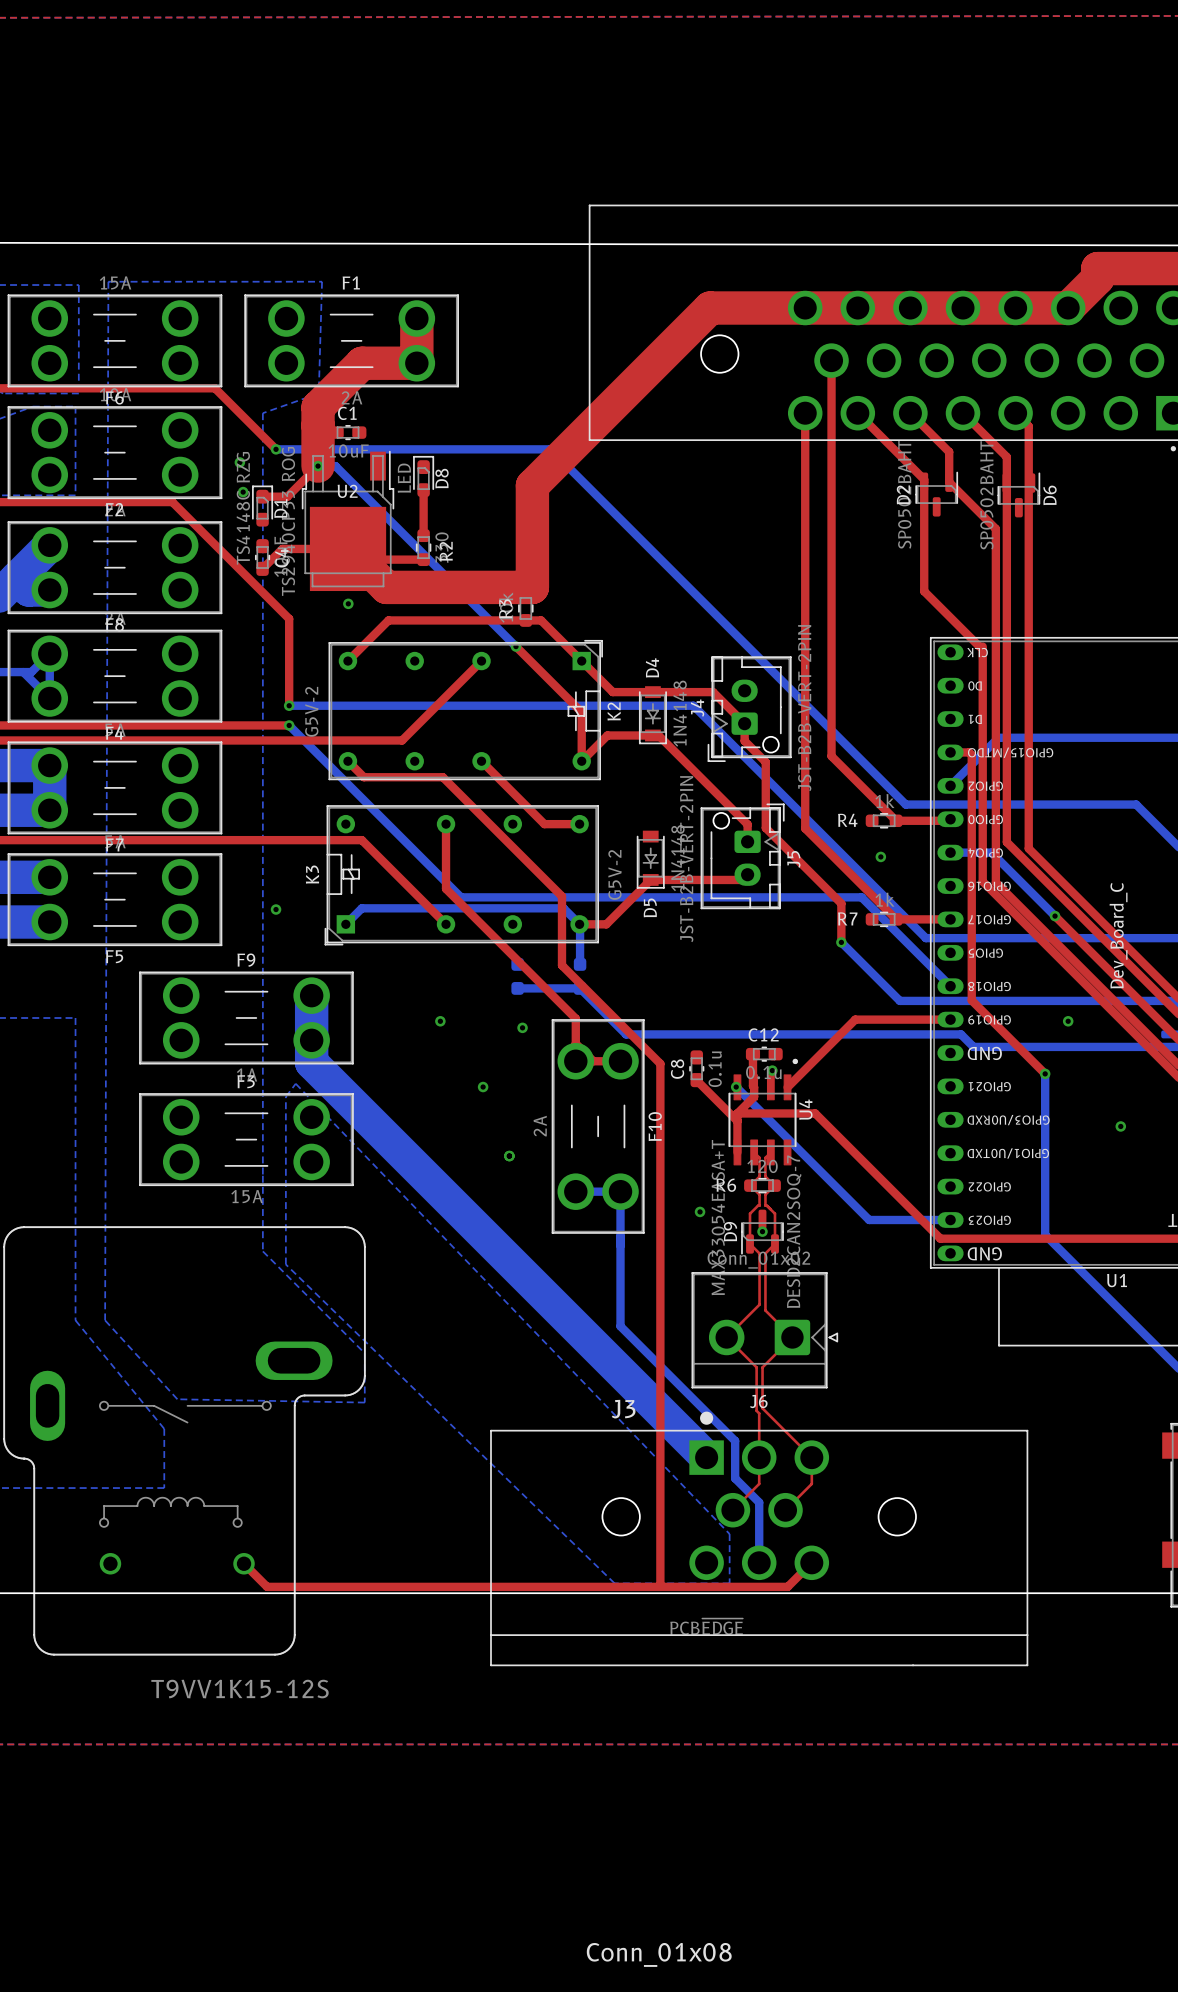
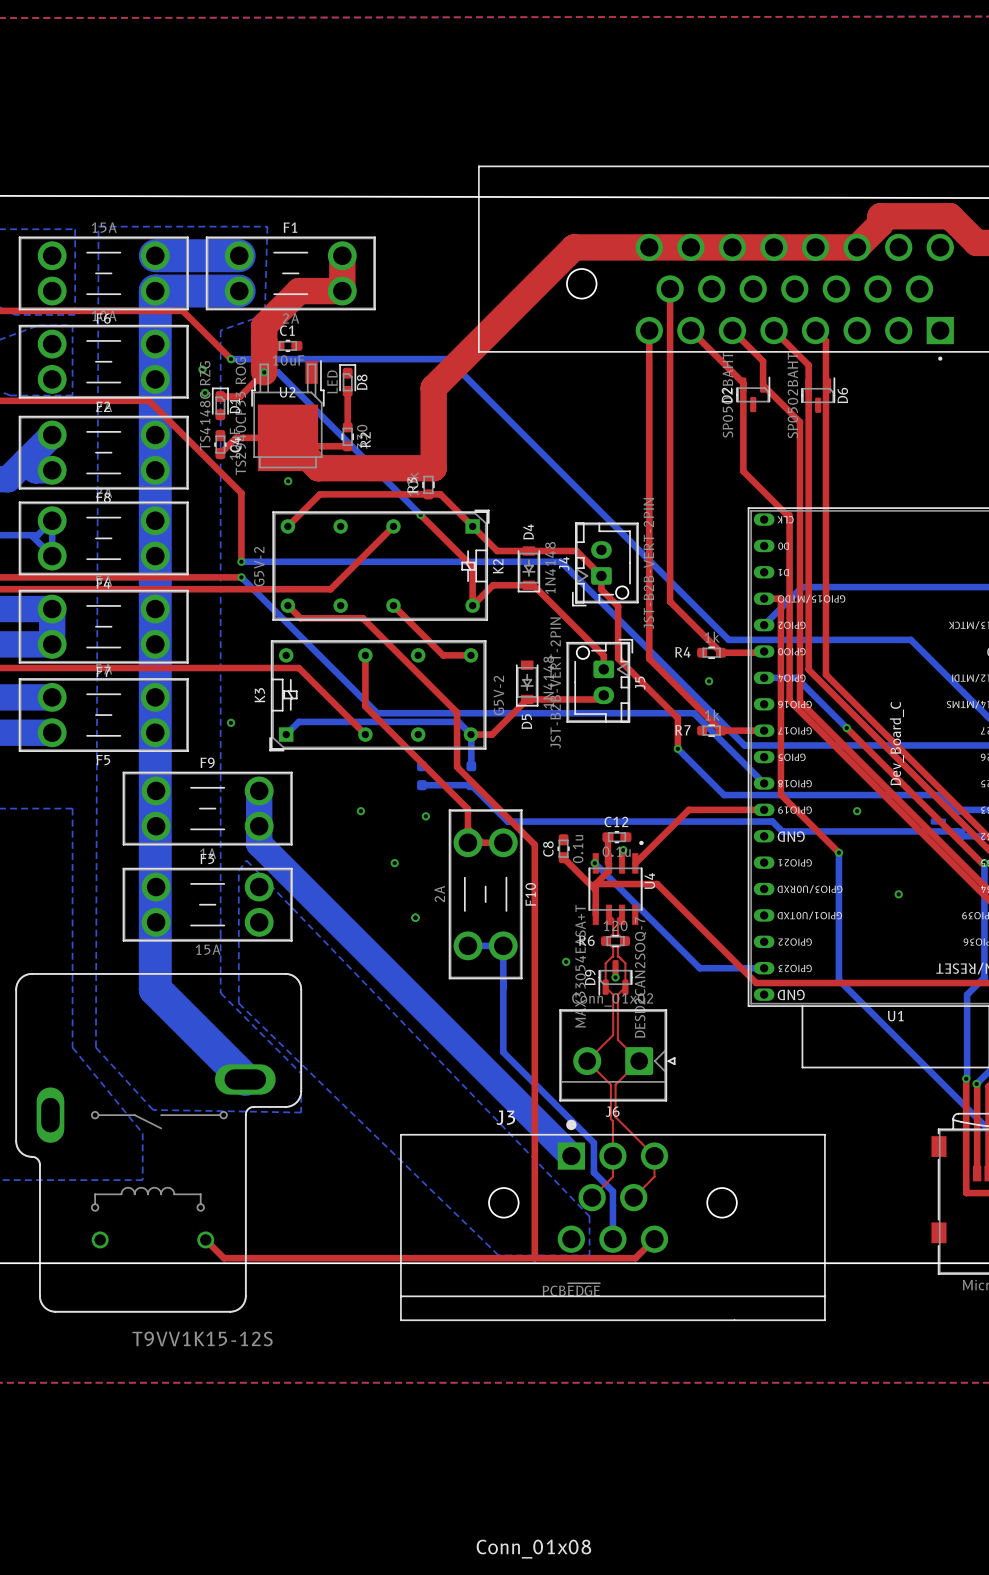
bottom track: none -> (155, 255) (239, 255)
bottom track: none -> (239, 291) (155, 291) (155, 989) (245, 1079)

